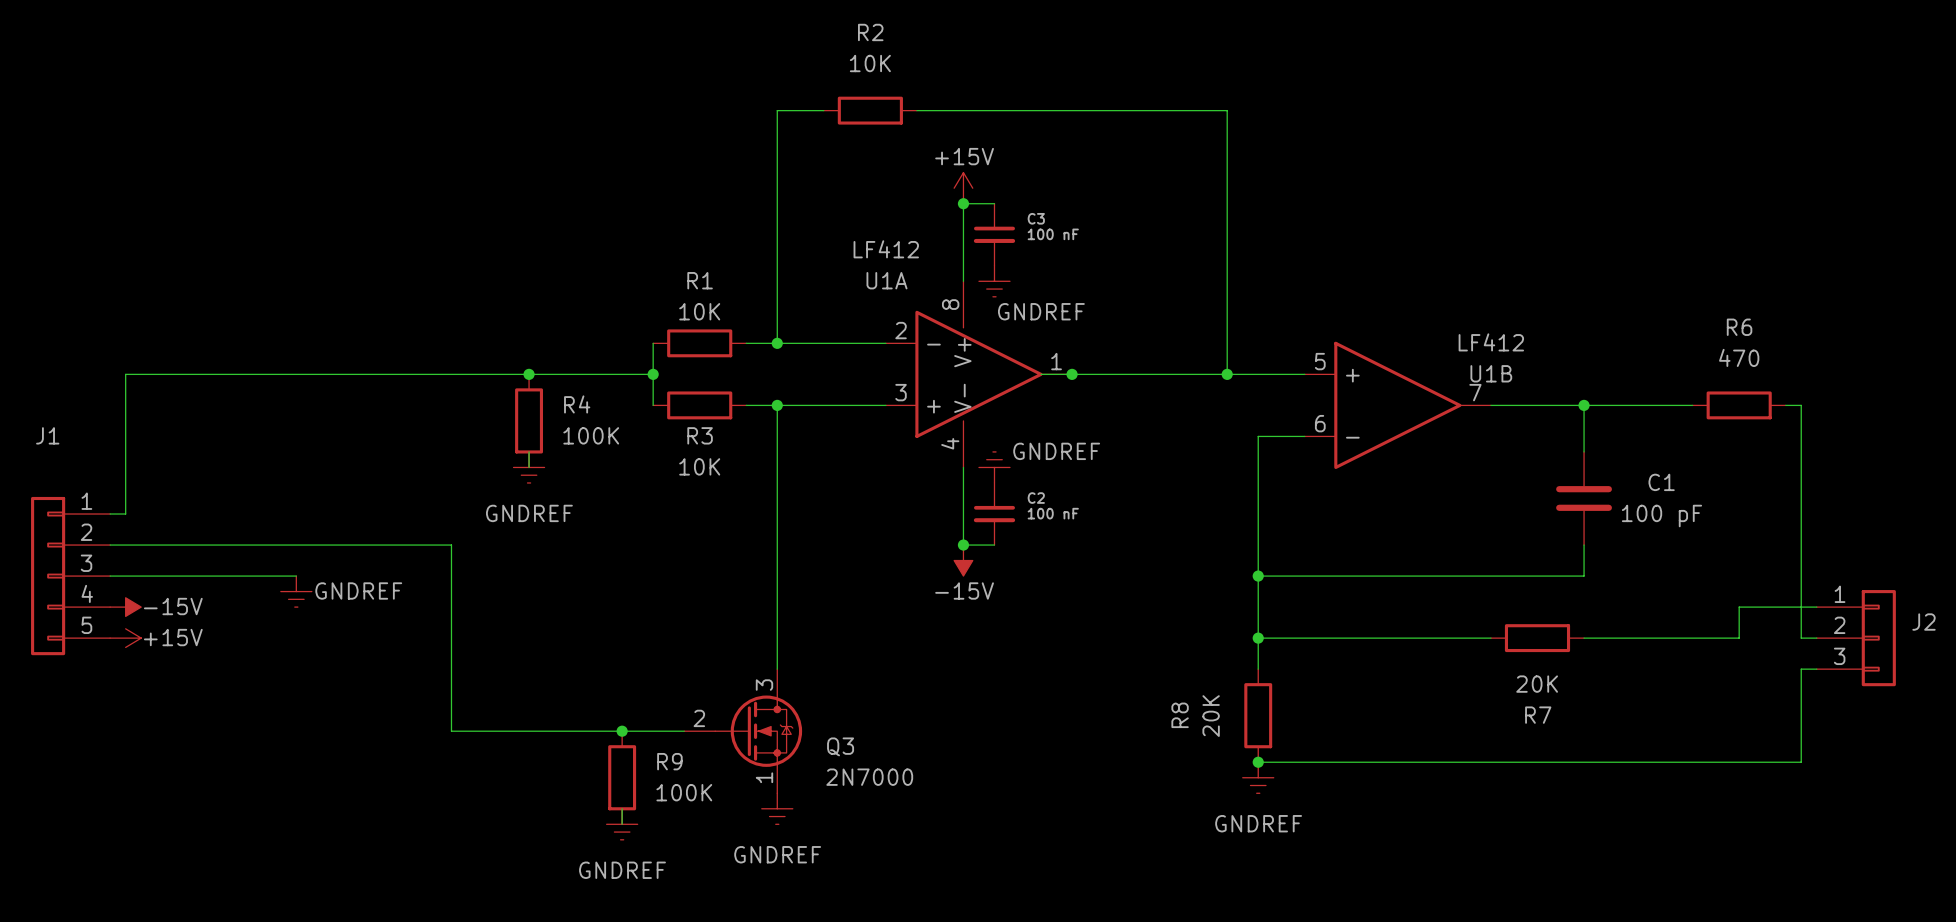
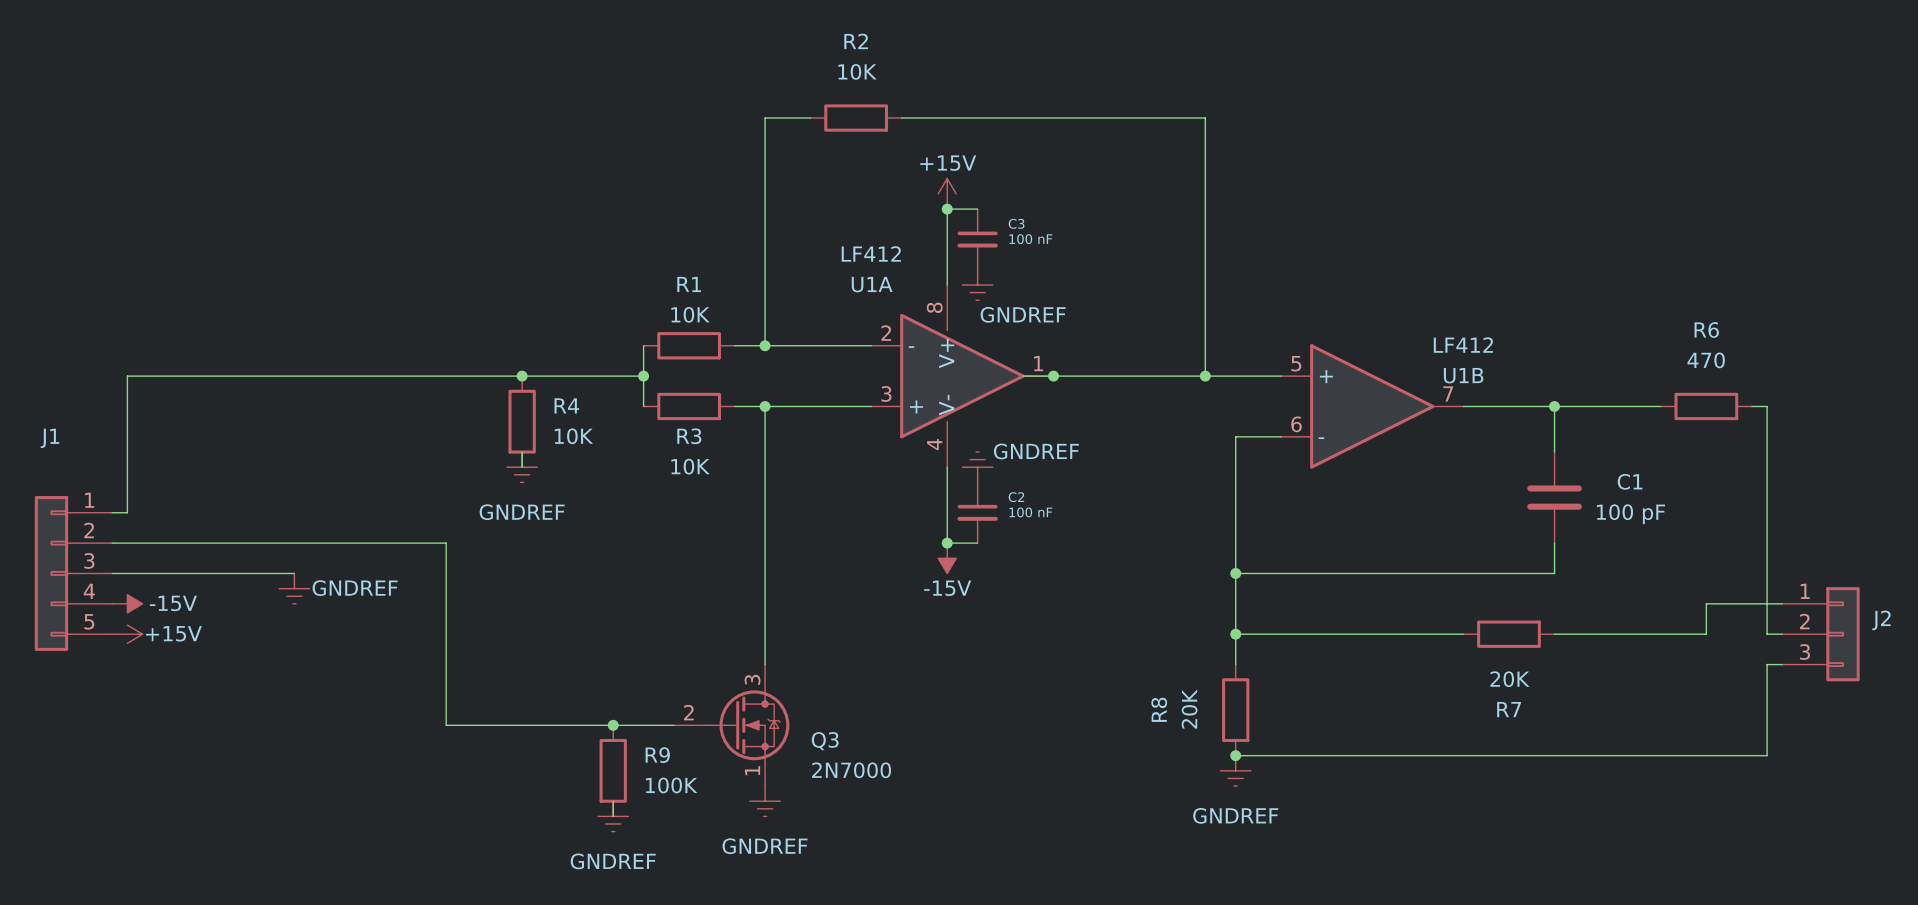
R4 value: 100K (591, 435) -> 10K (573, 436)

